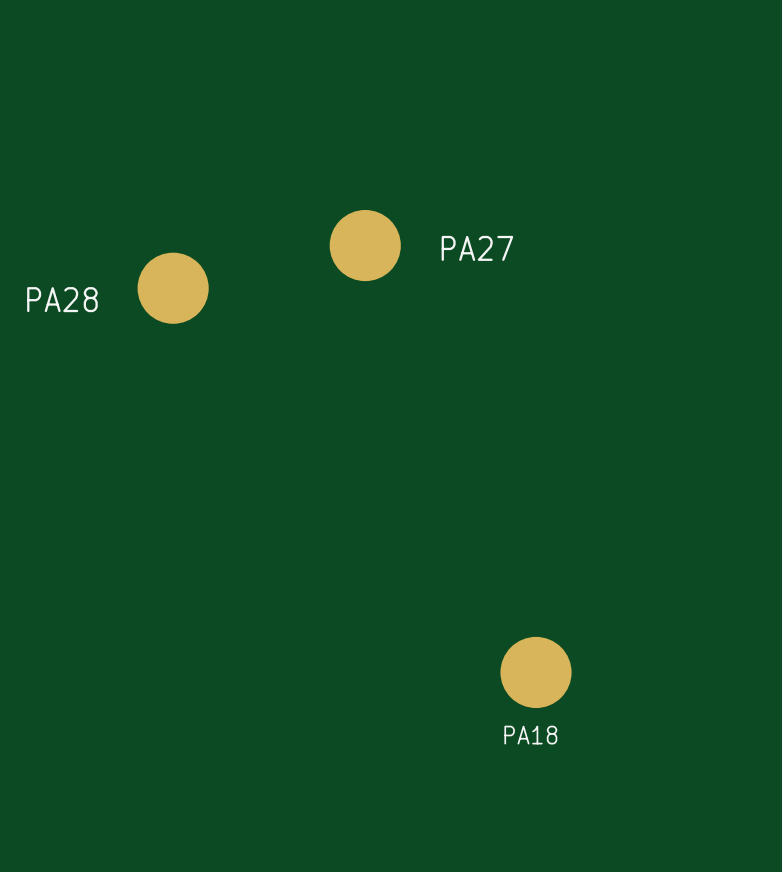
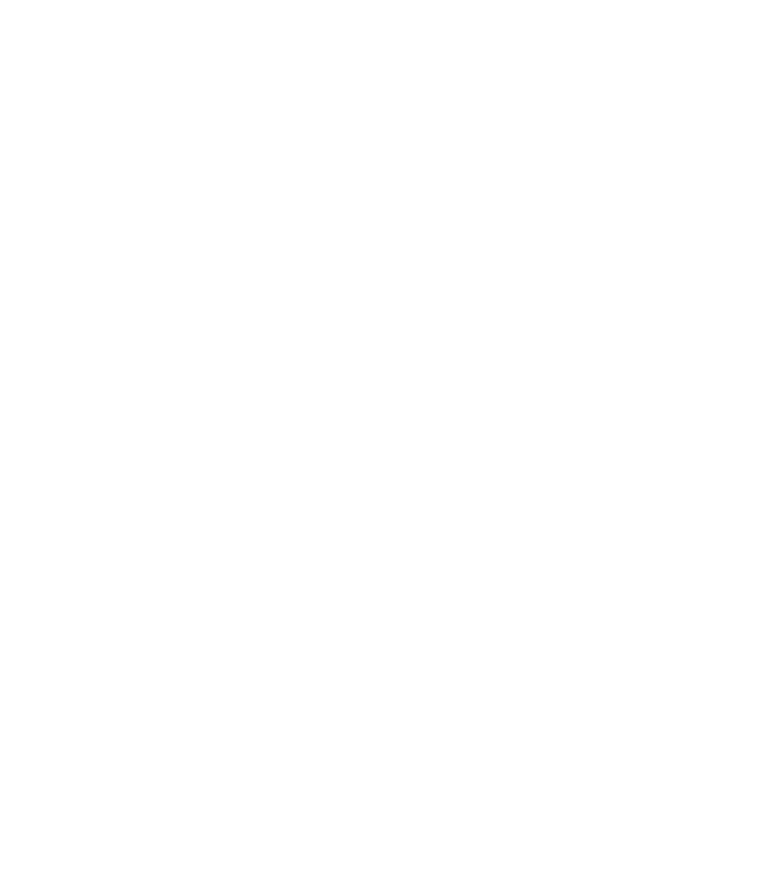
PA27: (365, 245) -> none
PA28: (173, 288) -> none
PA18: (536, 672) -> none

